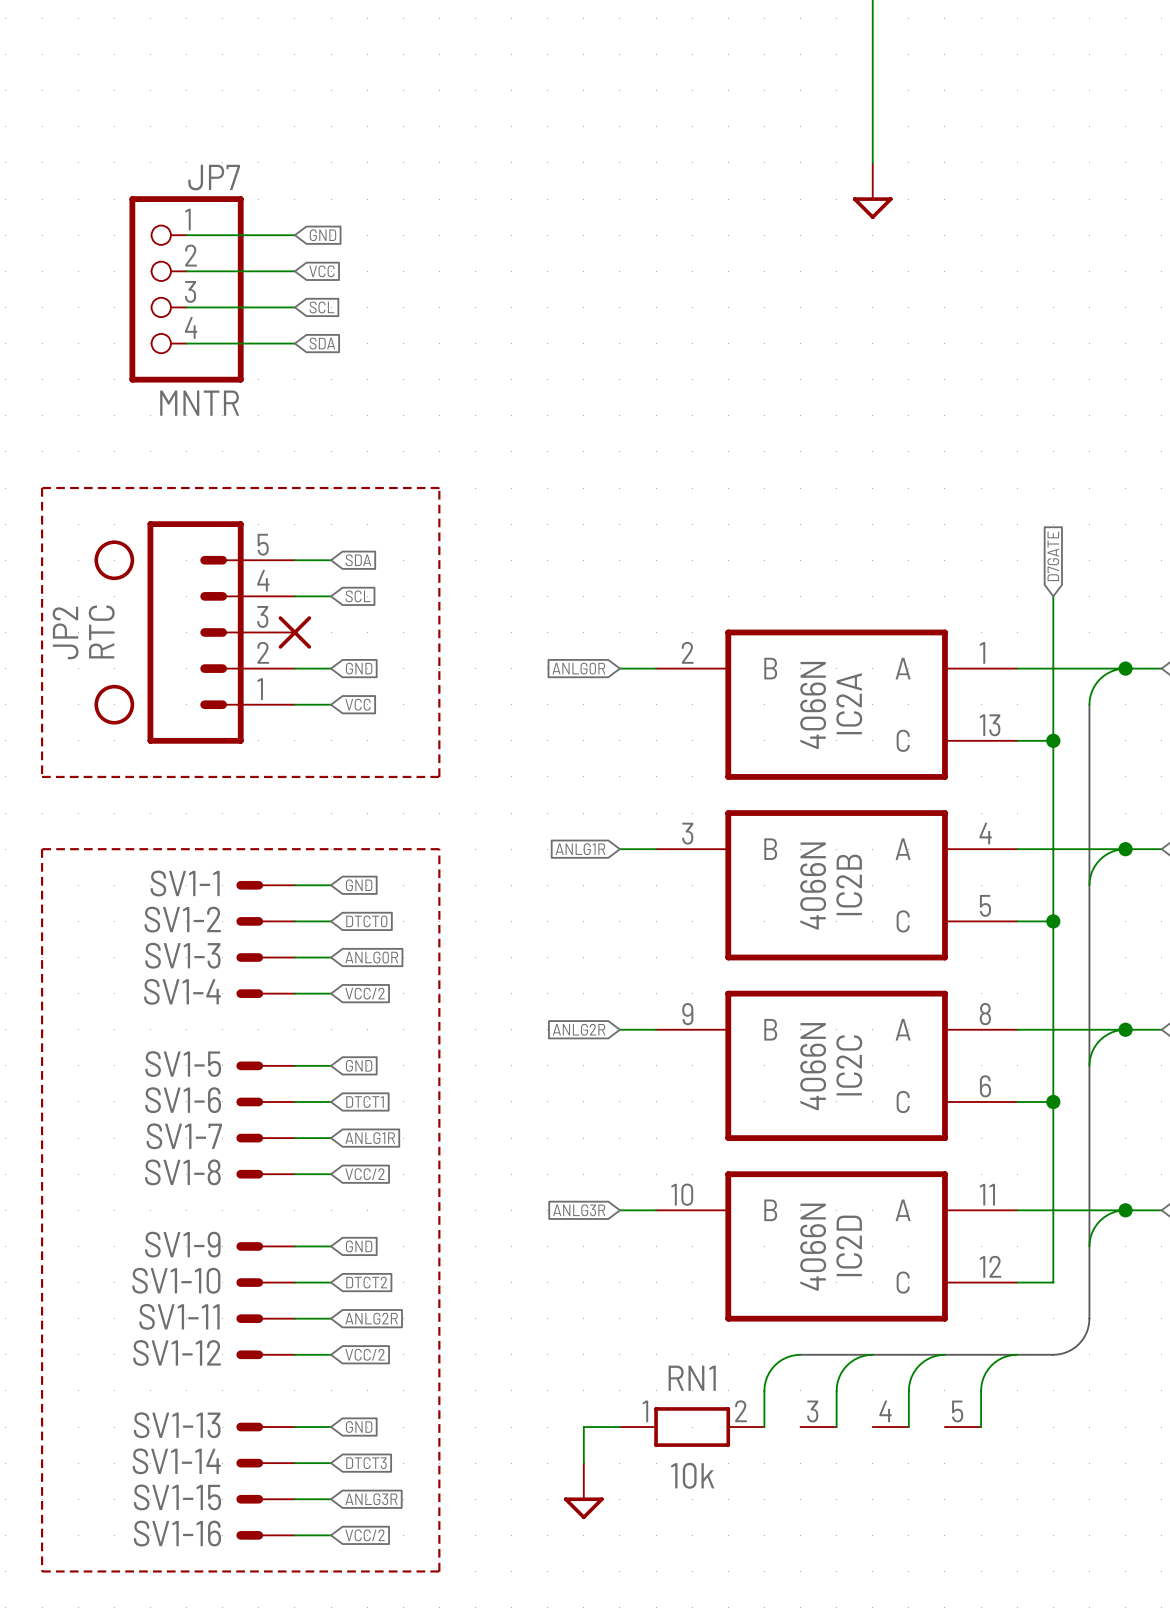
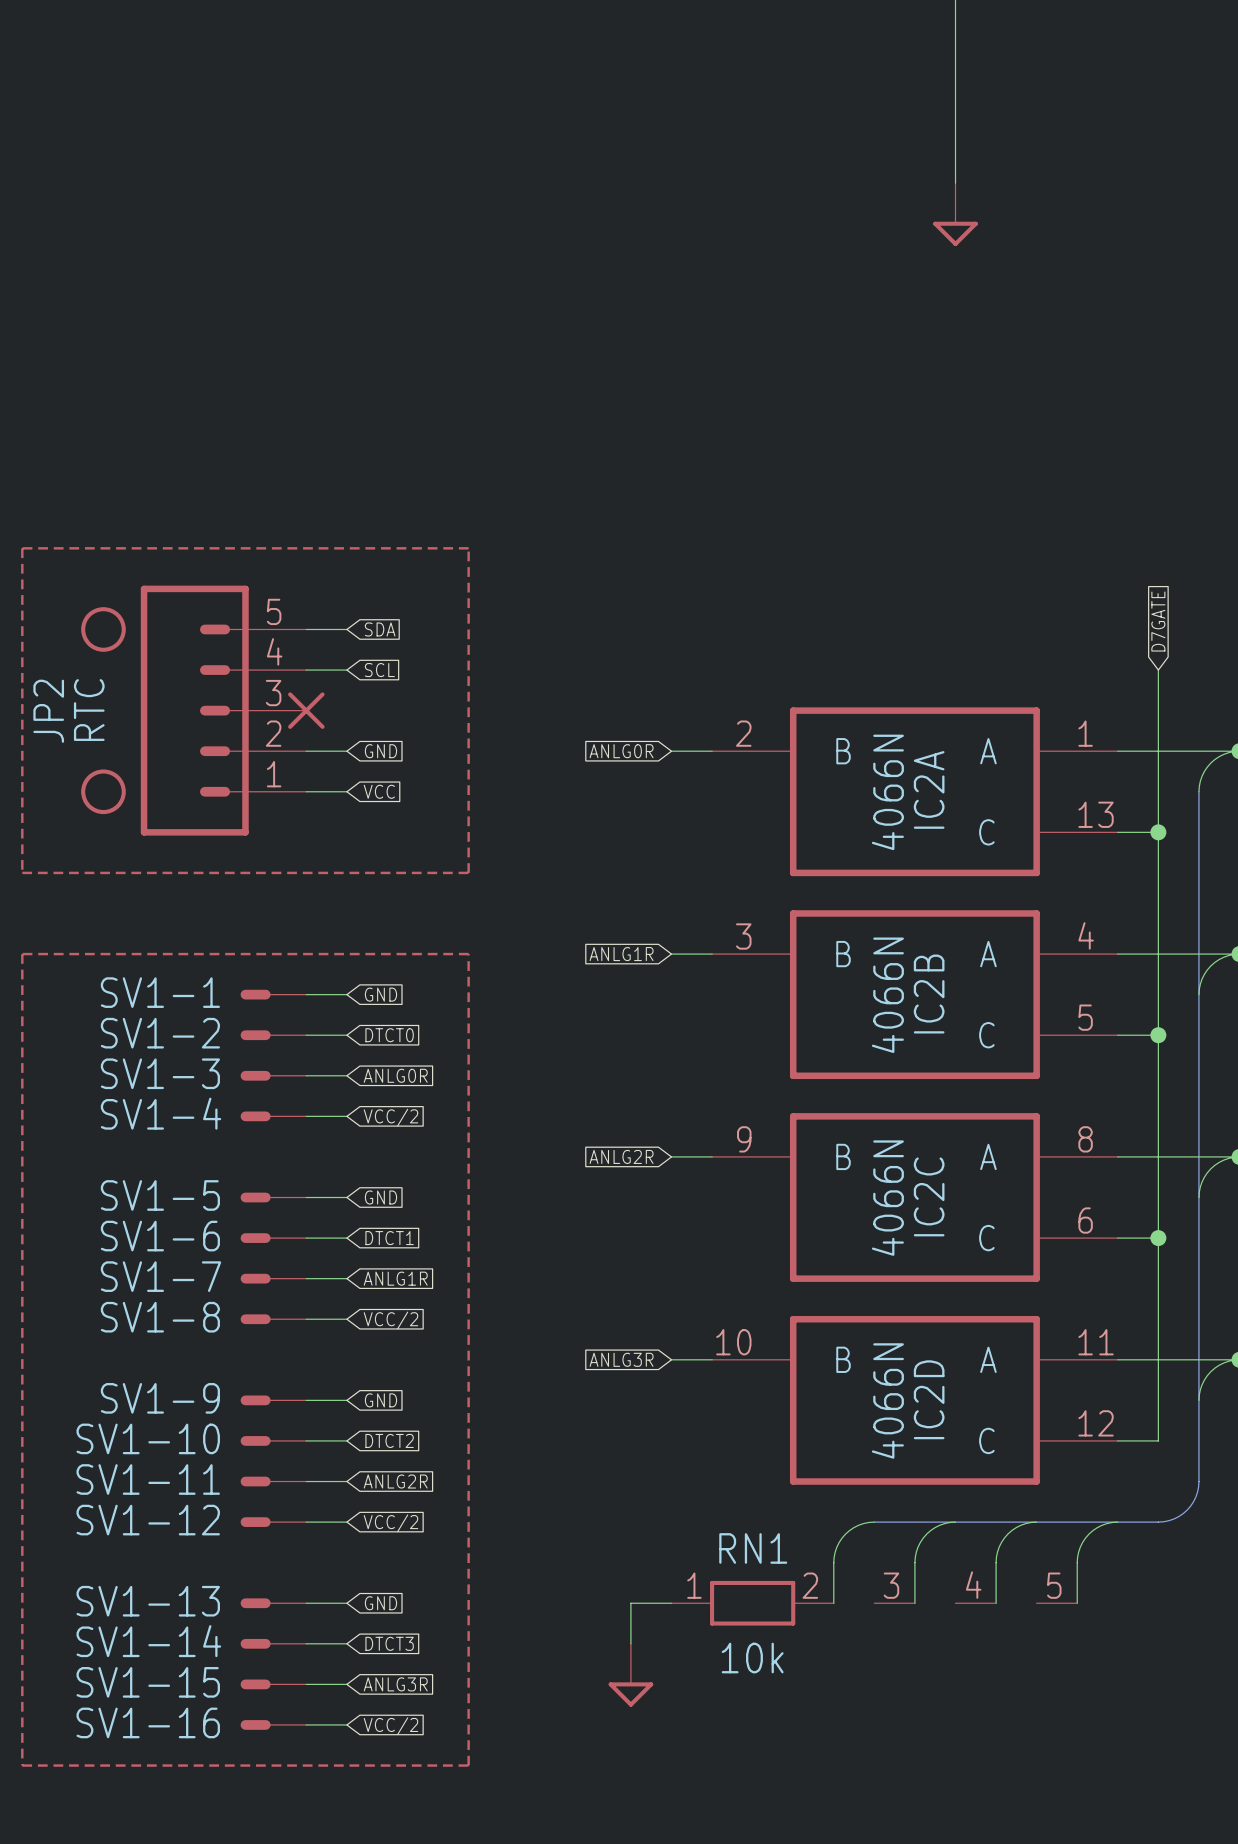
wire: (186, 235) (294, 235) -> none
global label: GND (323, 235) -> none
wire: (186, 271) (294, 271) -> none
global label: VCC (321, 271) -> none
JP7: MNTR (186, 289) -> none
wire: (186, 307) (294, 307) -> none
global label: SCL (321, 307) -> none
wire: (186, 343) (294, 343) -> none
global label: SDA (322, 343) -> none

